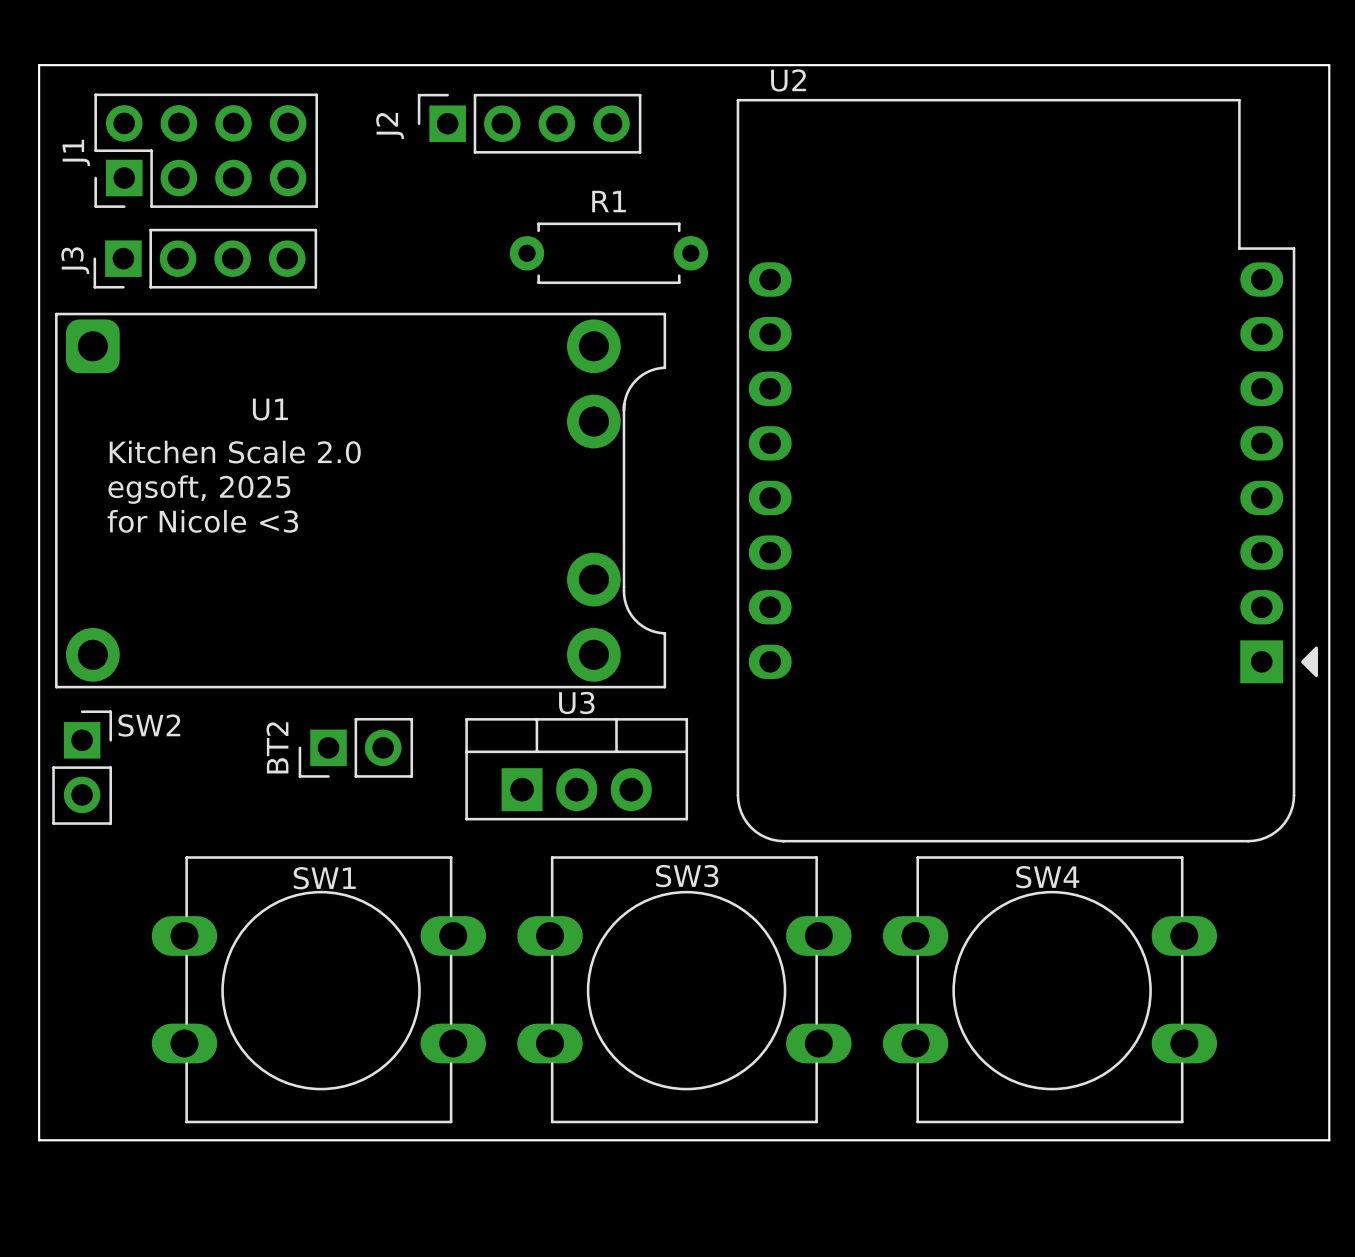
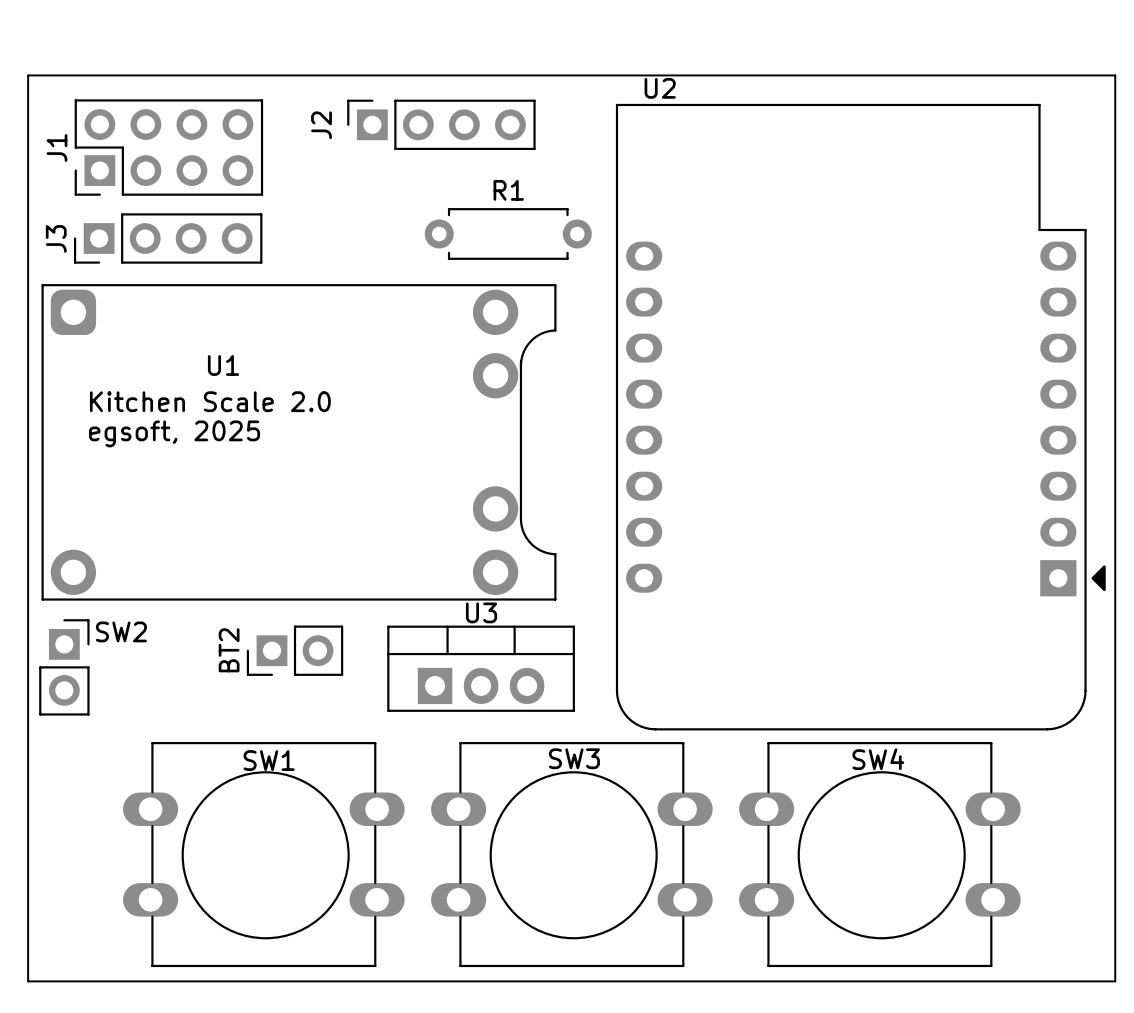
text: for Nicole <3 (202, 521) -> none

